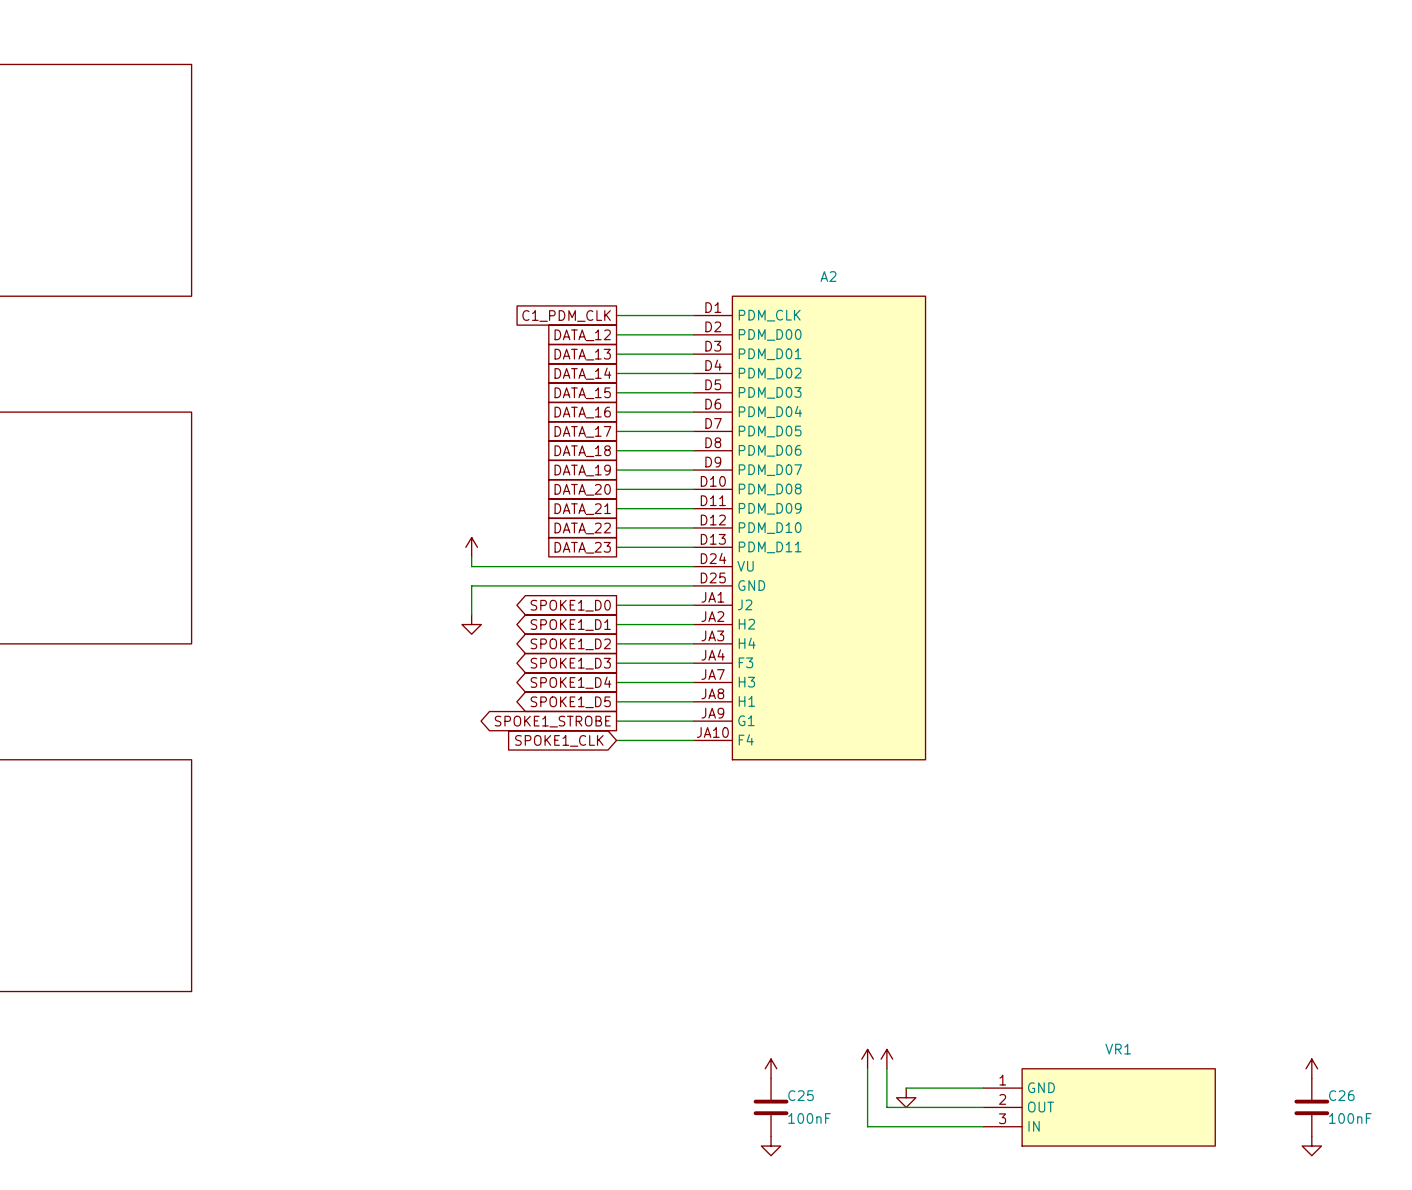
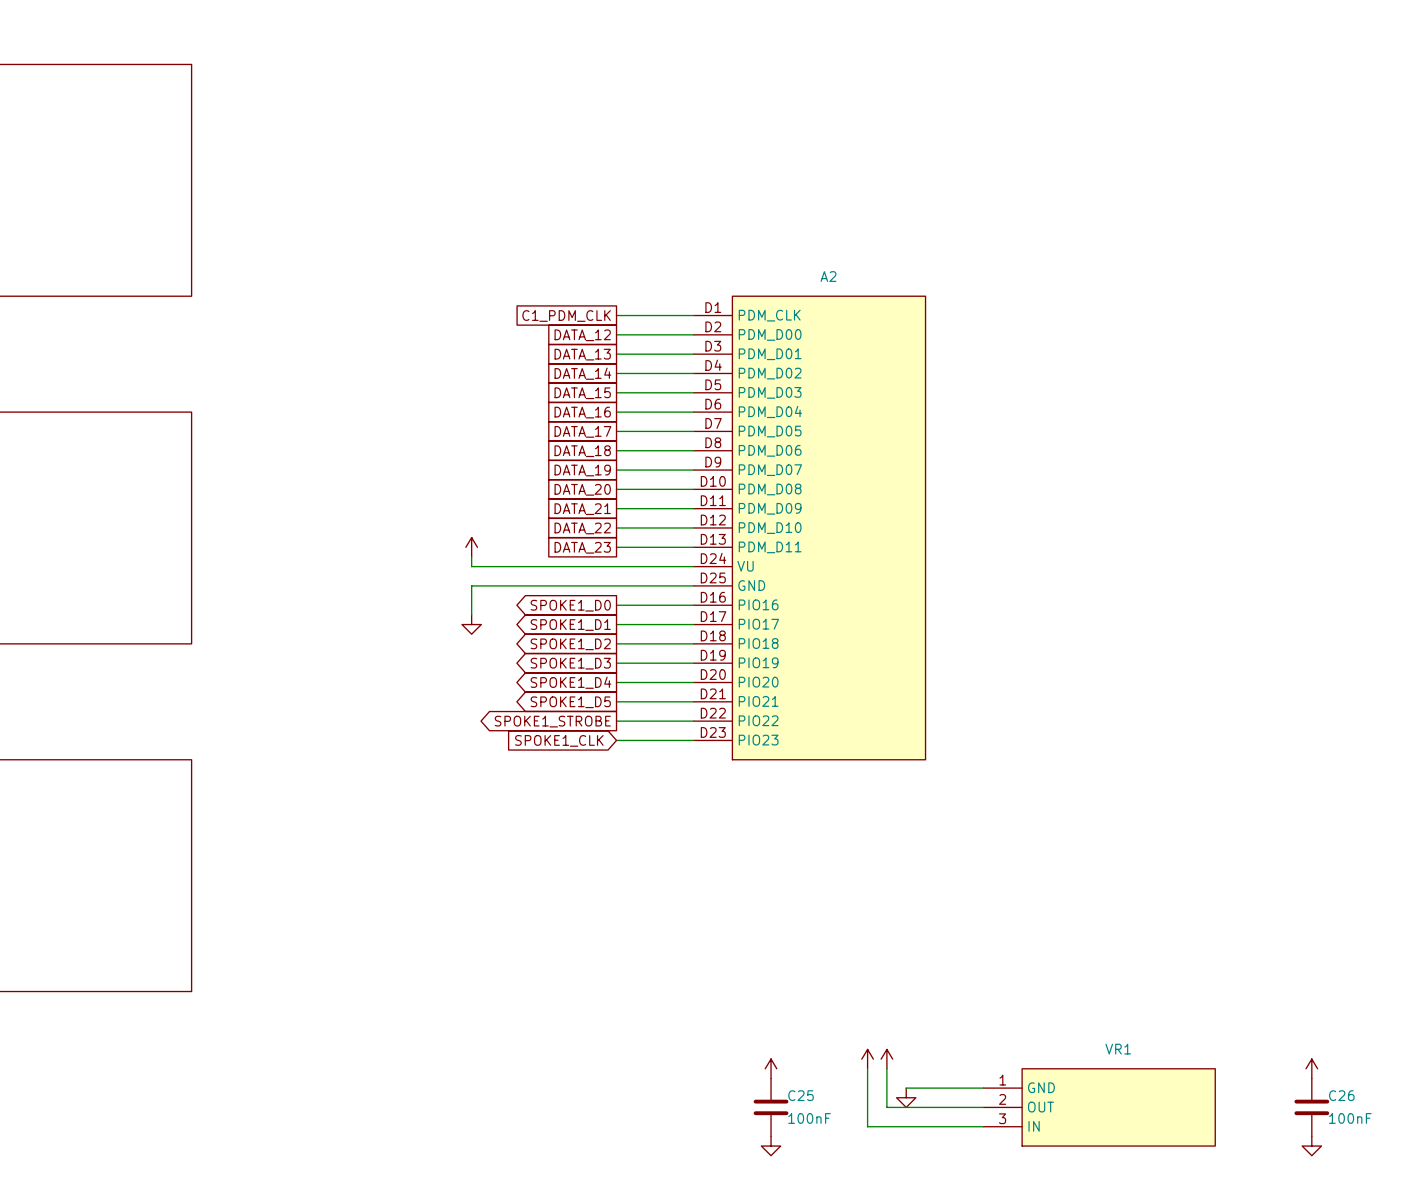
A2 symbol: [693, 296, 926, 760] -> [693, 296, 926, 760]

